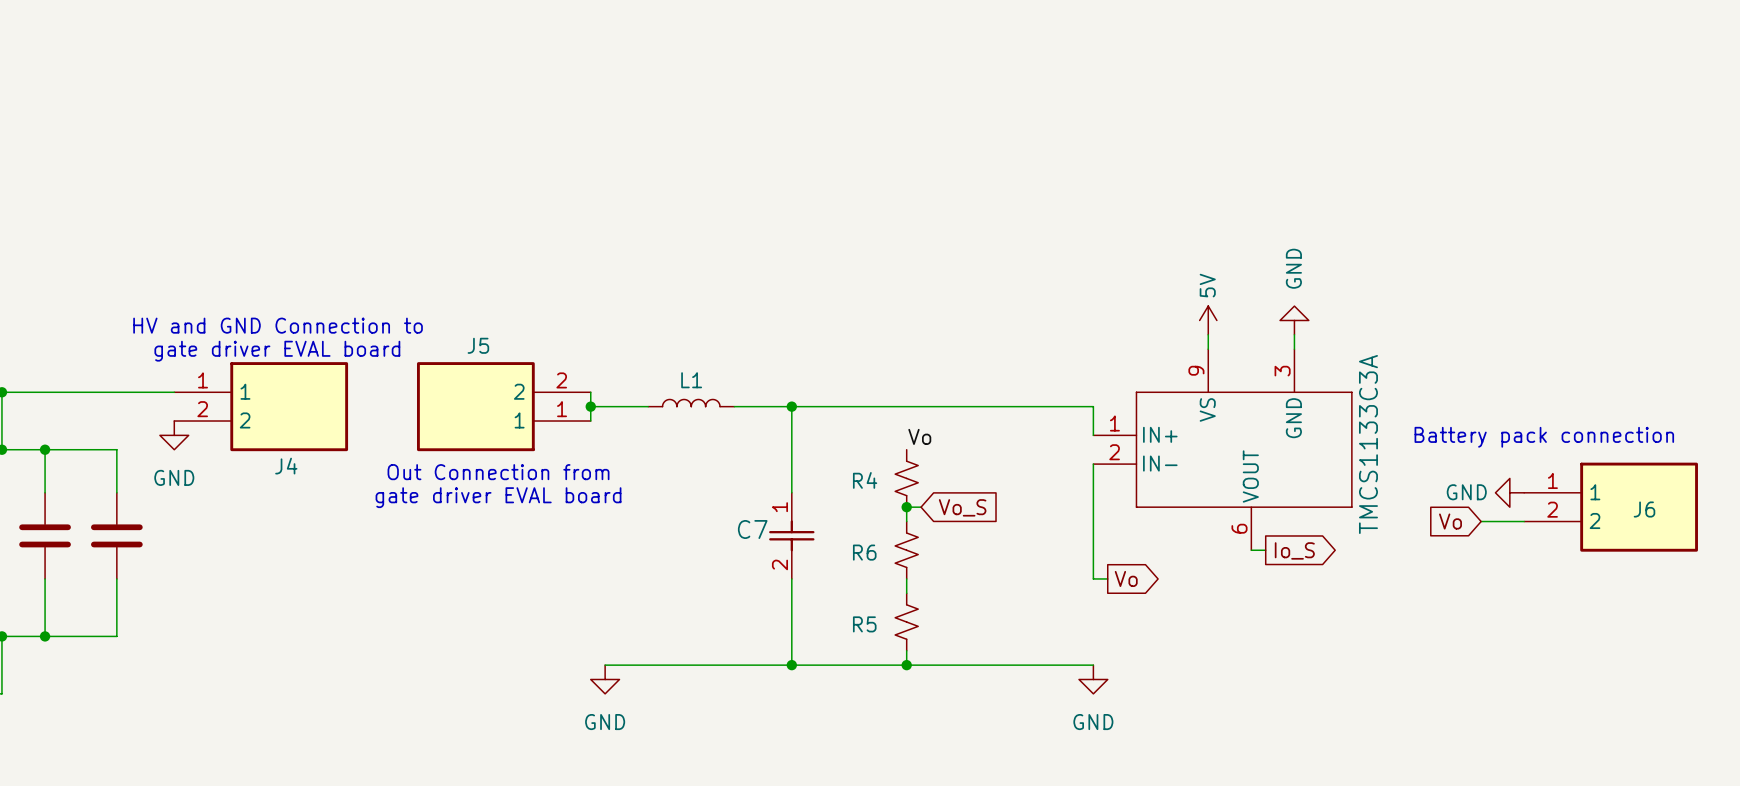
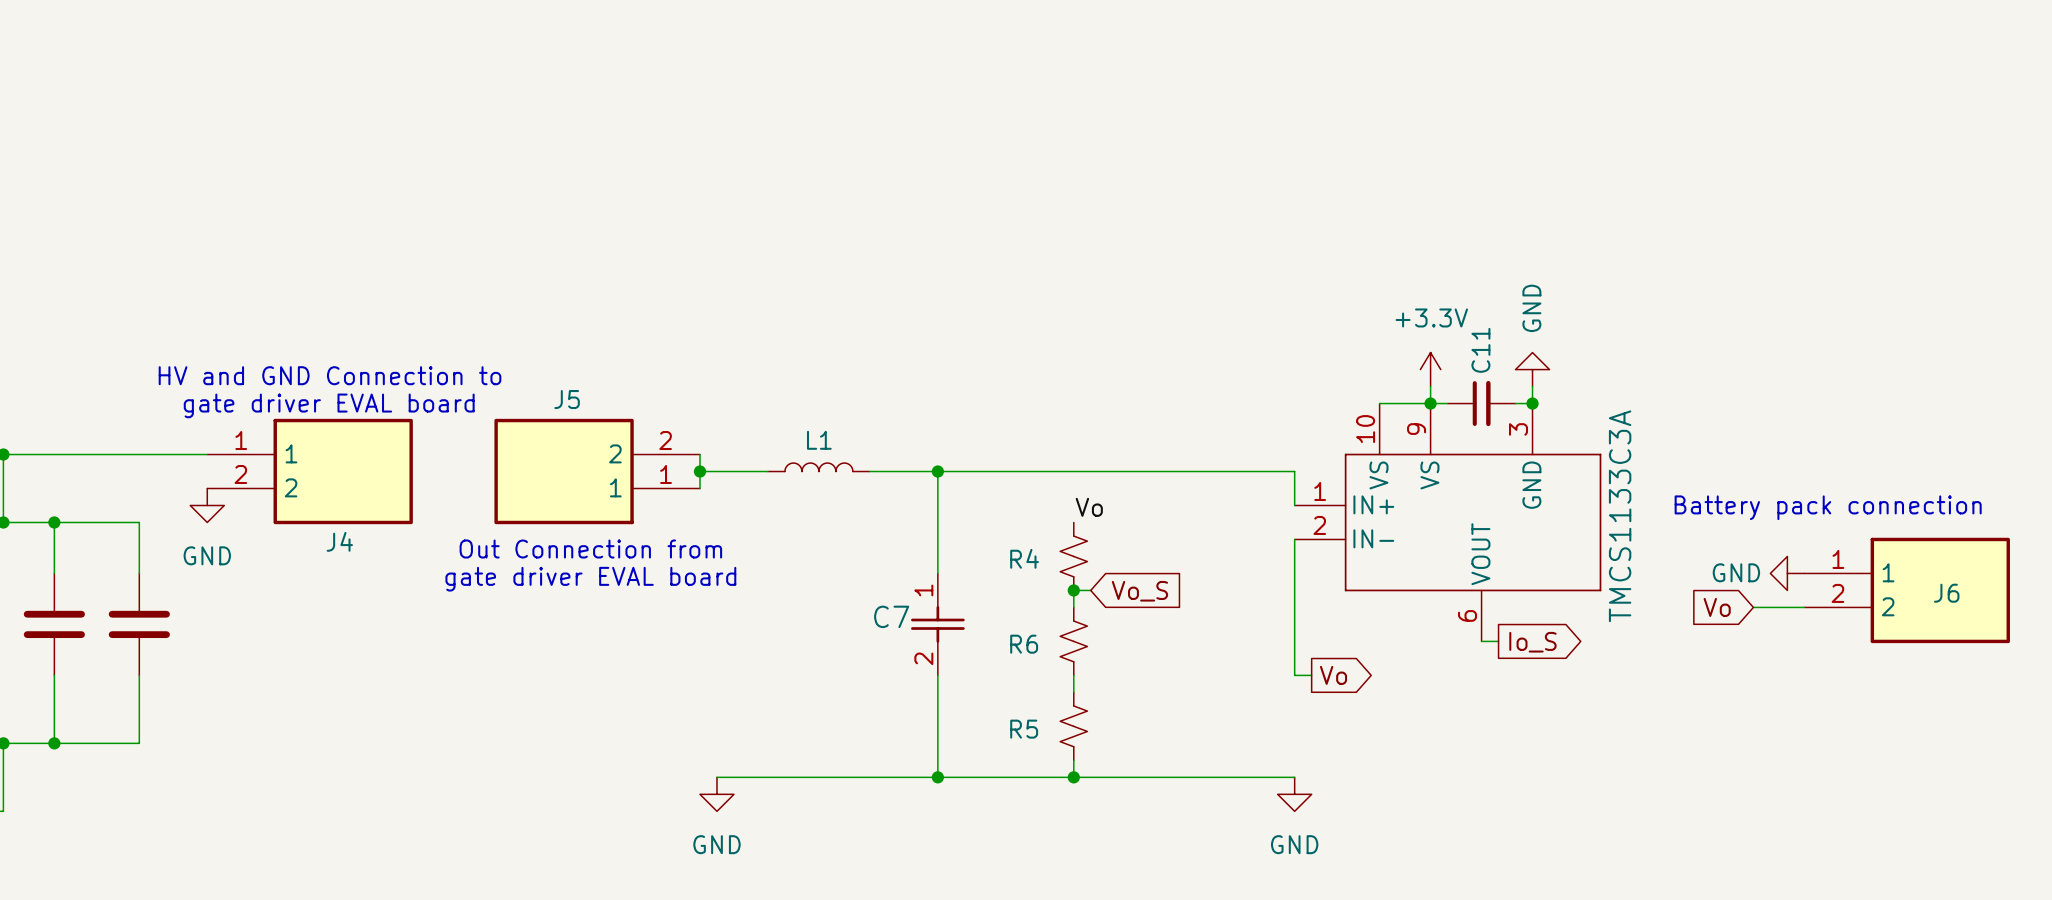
power symbol: 5V (1208, 320) -> +3.3V (1430, 369)
part symbol: [1093, 349, 1353, 551] -> [1294, 403, 1602, 642]
wire: none -> (1379, 403) (1447, 403)
junction: none -> (1430, 403)
C11: none -> (1481, 403)
wire: none -> (1515, 403) (1532, 403)
junction: none -> (1532, 403)

